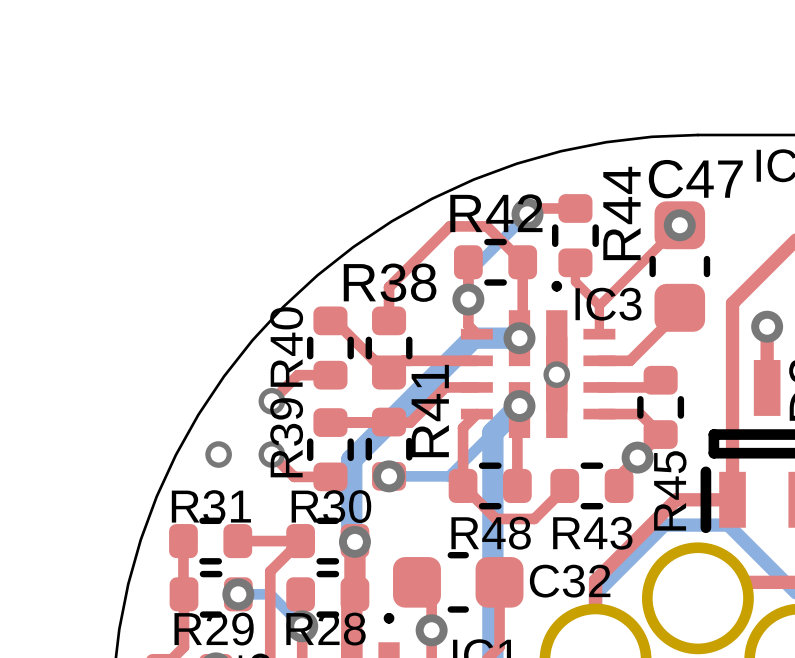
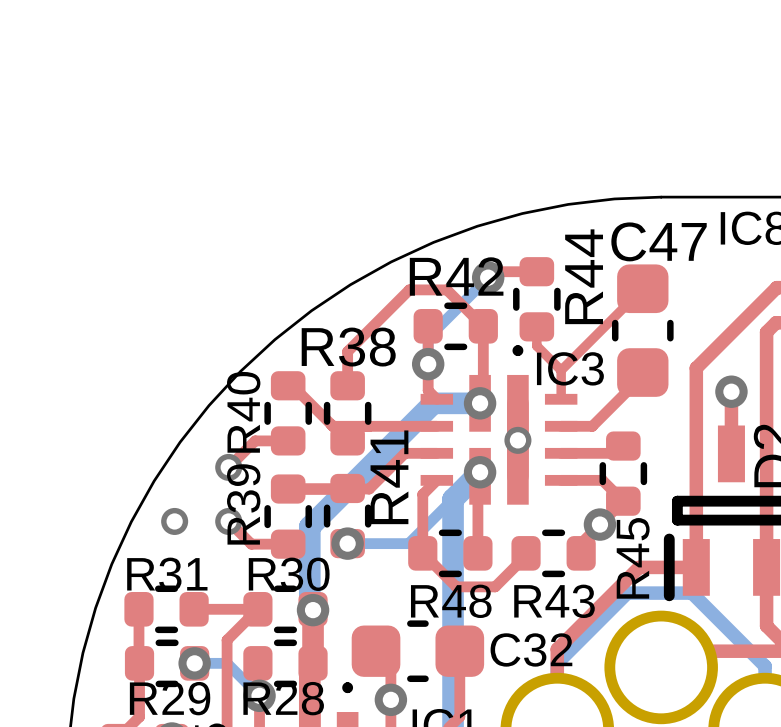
via: (679, 225) -> none

